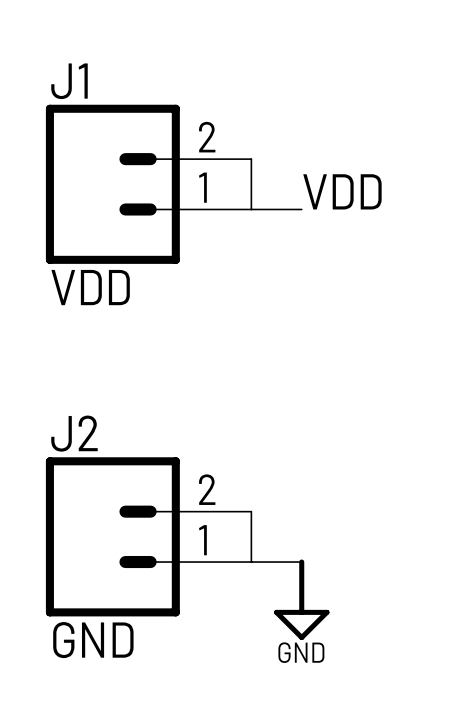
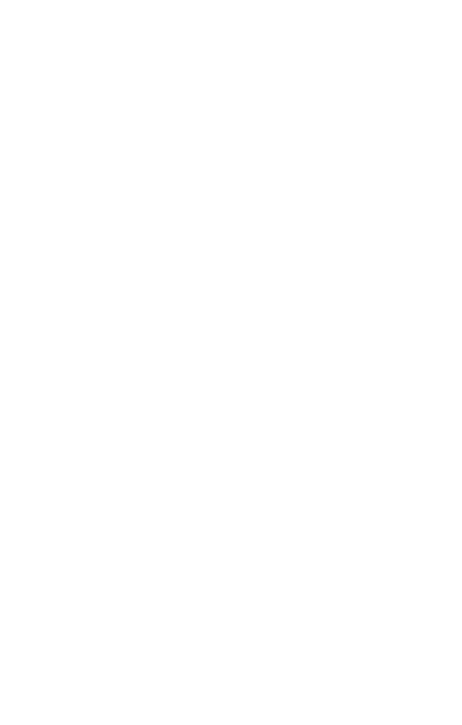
wire: (251, 159) (251, 209) (301, 209) -> none
J1: VDD (148, 184) -> none
label: VDD (342, 191) -> none
wire: (251, 511) (251, 562) (301, 562) -> none
J2: GND (148, 536) -> none
power symbol: GND (301, 599) -> none

